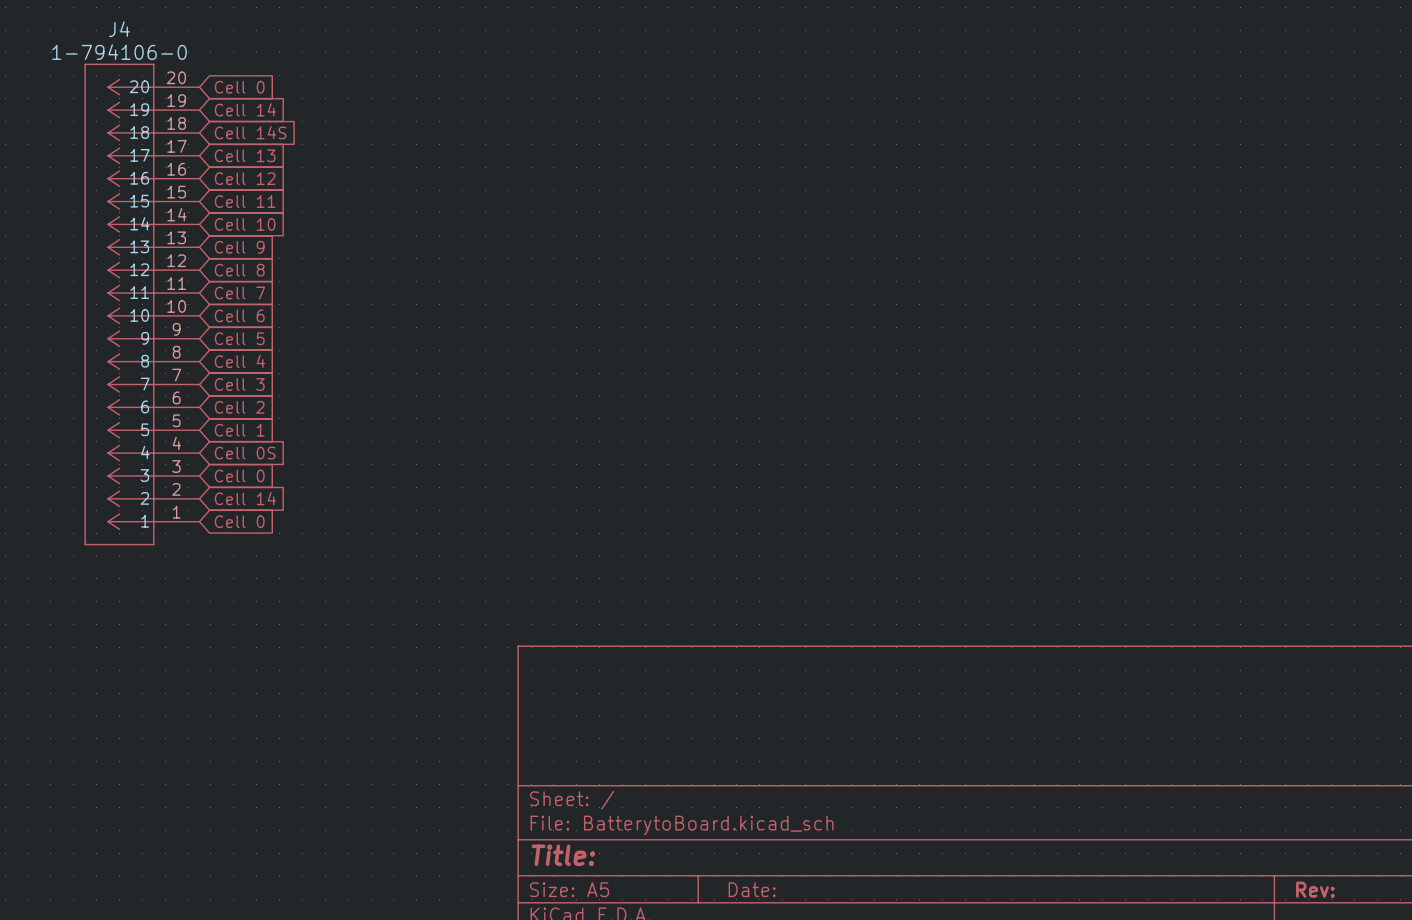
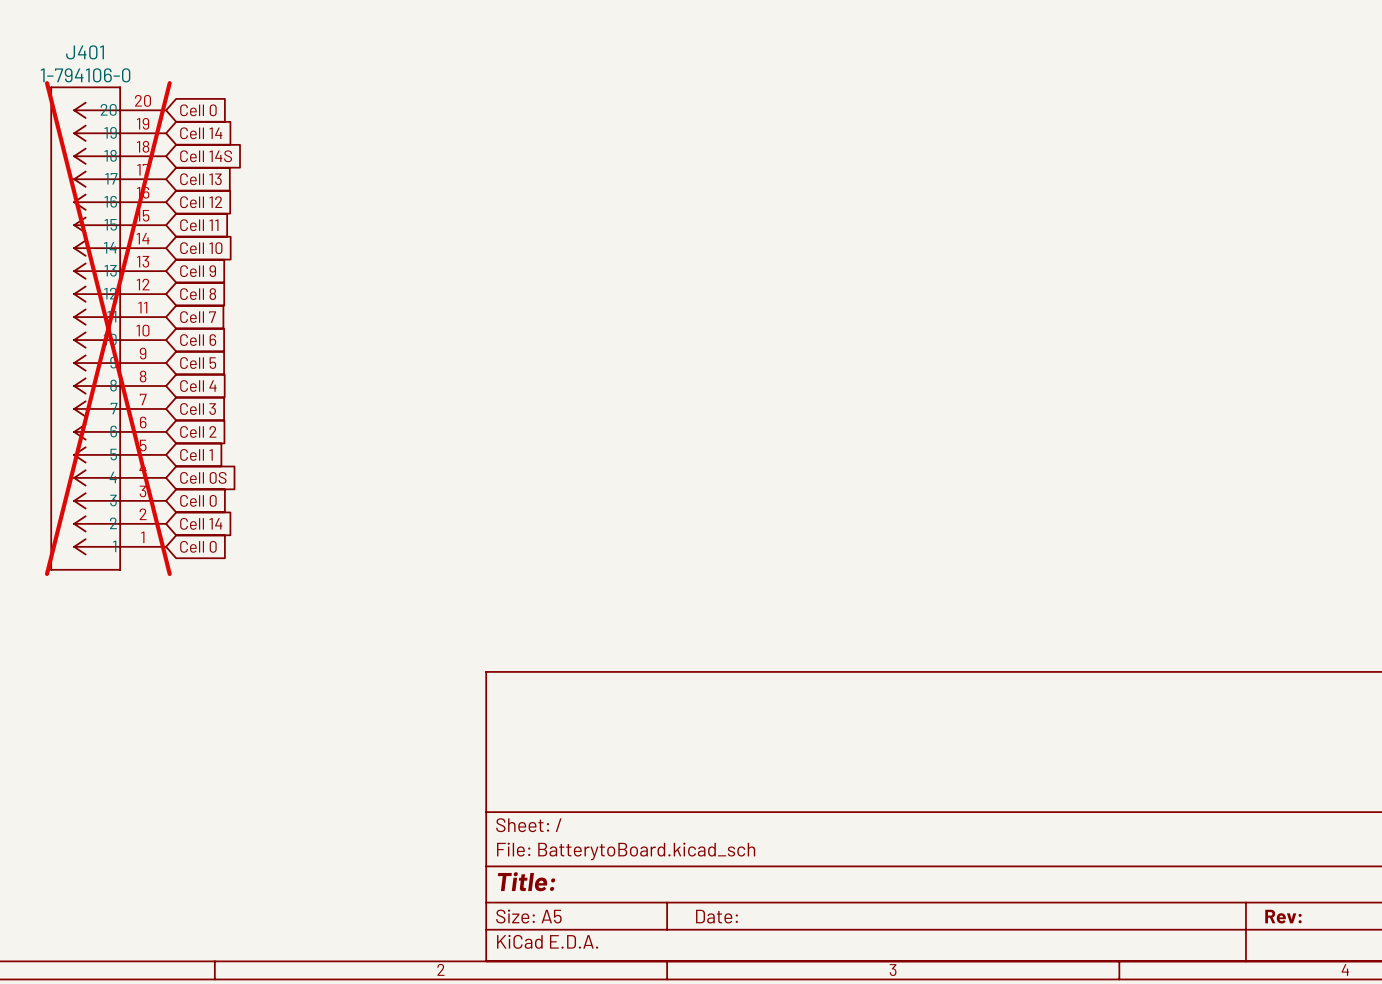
J4 name: J4 (119, 29) -> J401 (85, 52)
J4 do-not-place cross: none -> (108, 328)

